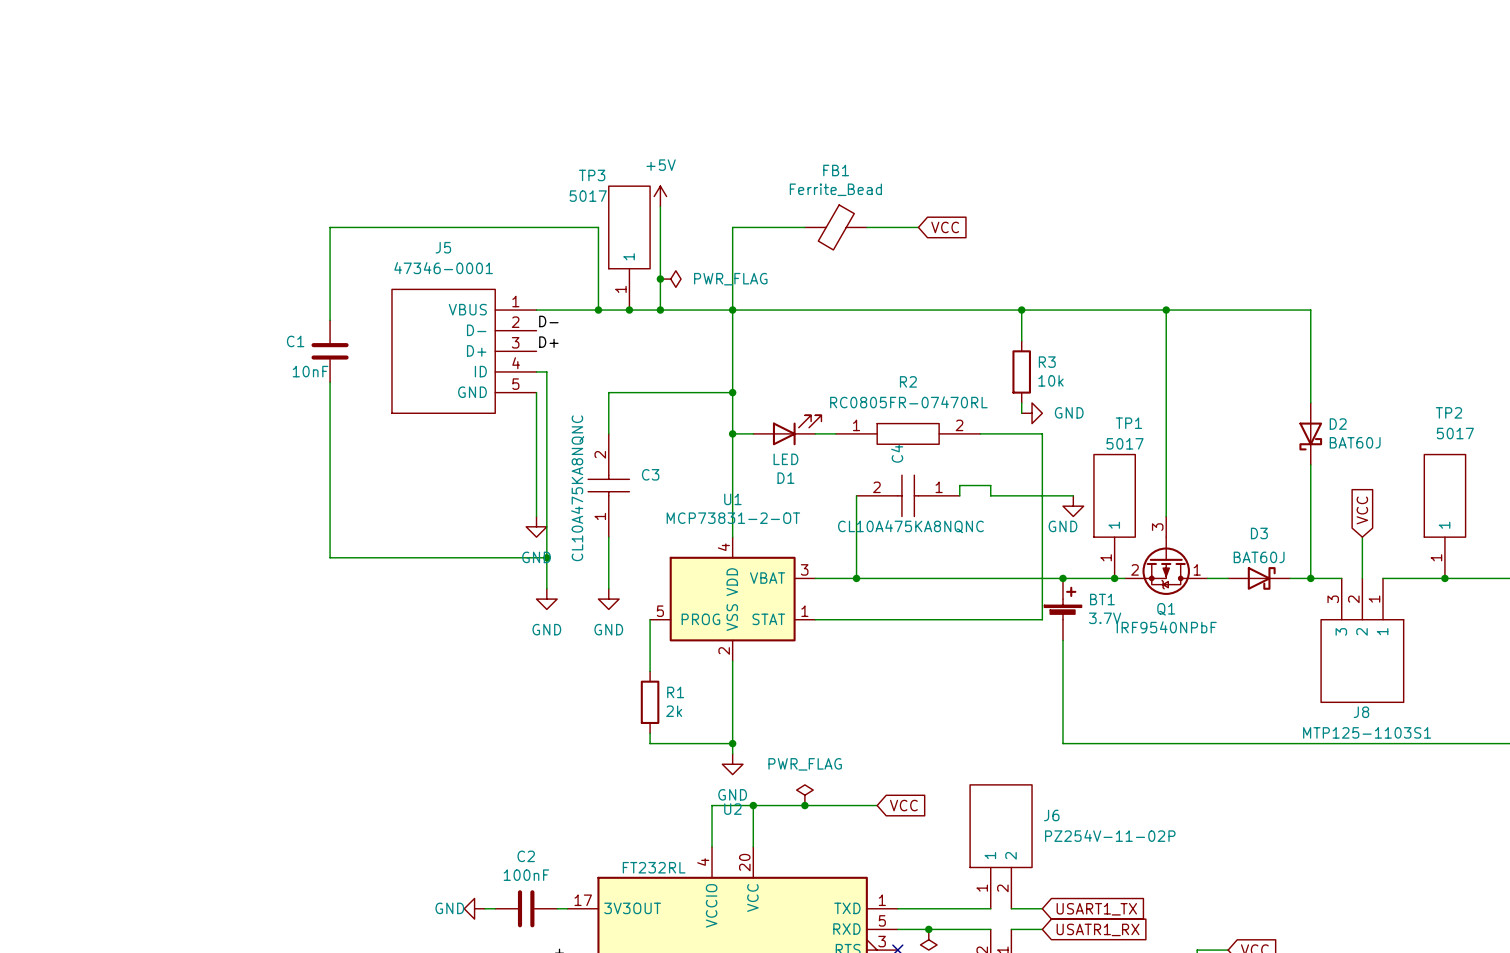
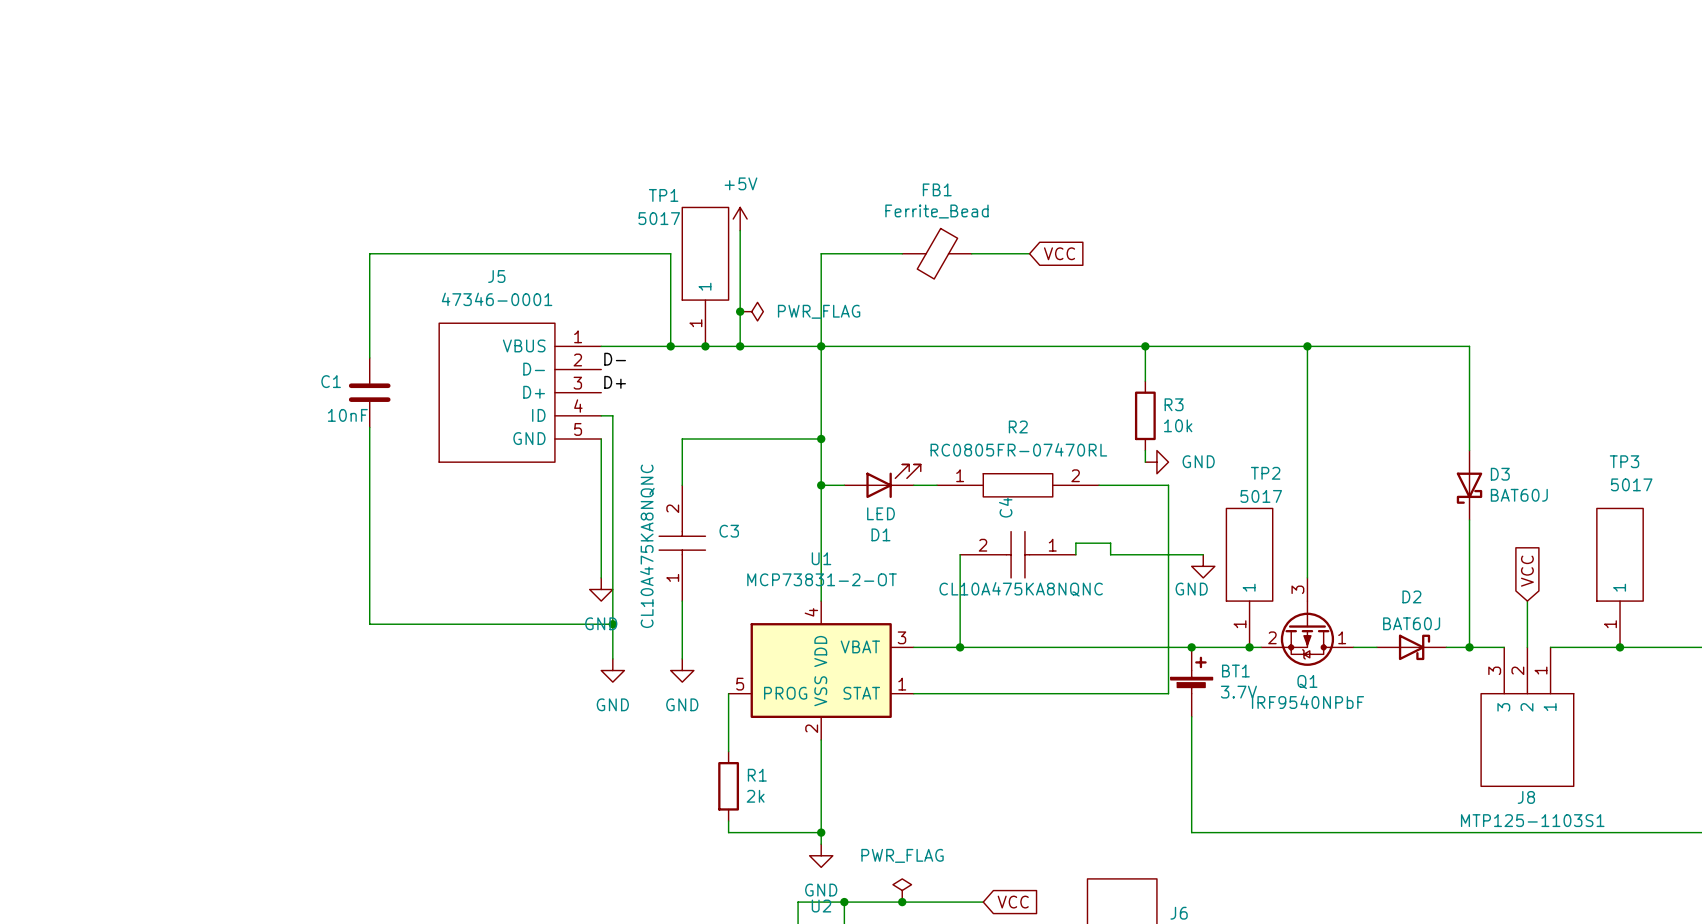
TP3 name: TP3 (592, 175) -> TP1 (663, 195)
TP2 name: TP2 (1448, 412) -> TP3 (1624, 461)
TP1 name: TP1 (1128, 423) -> TP2 (1265, 473)
D2 name: D2 (1338, 424) -> D3 (1500, 474)
D3 name: D3 (1259, 533) -> D2 (1411, 596)

